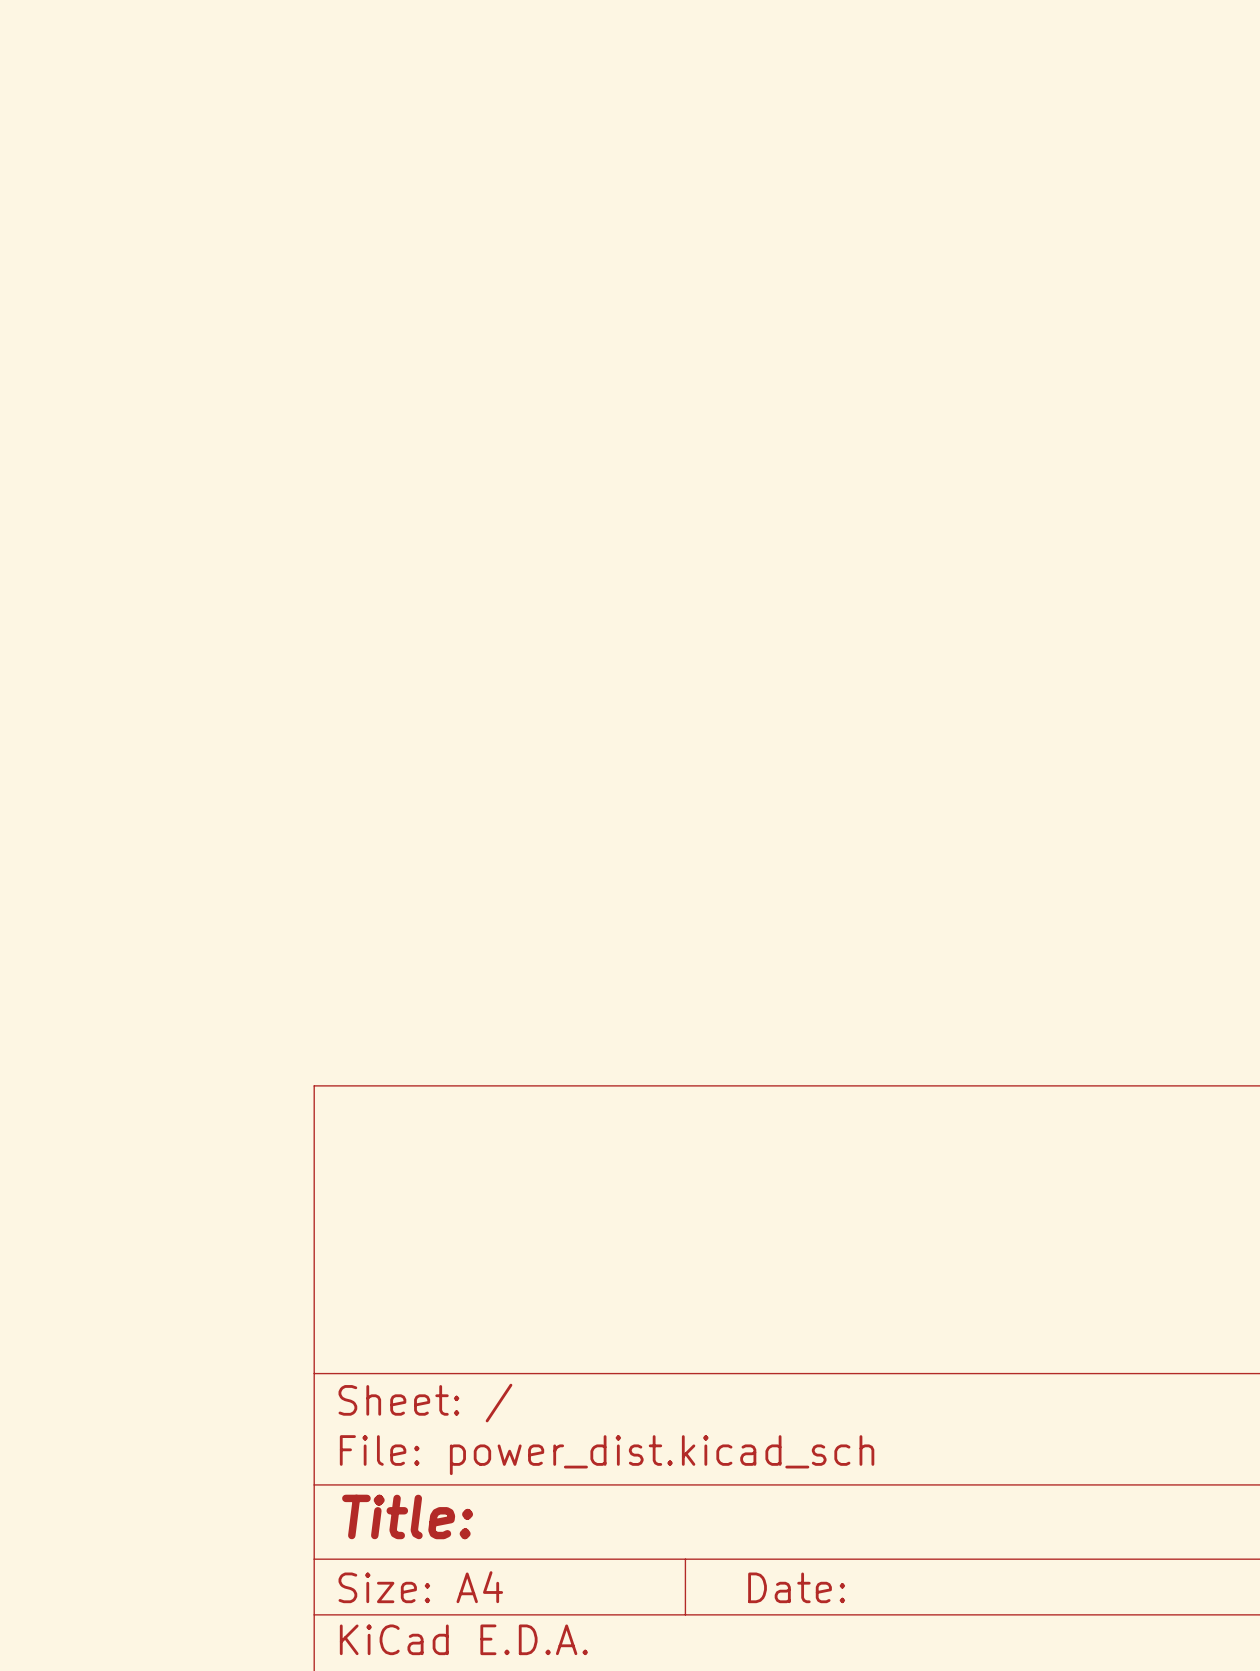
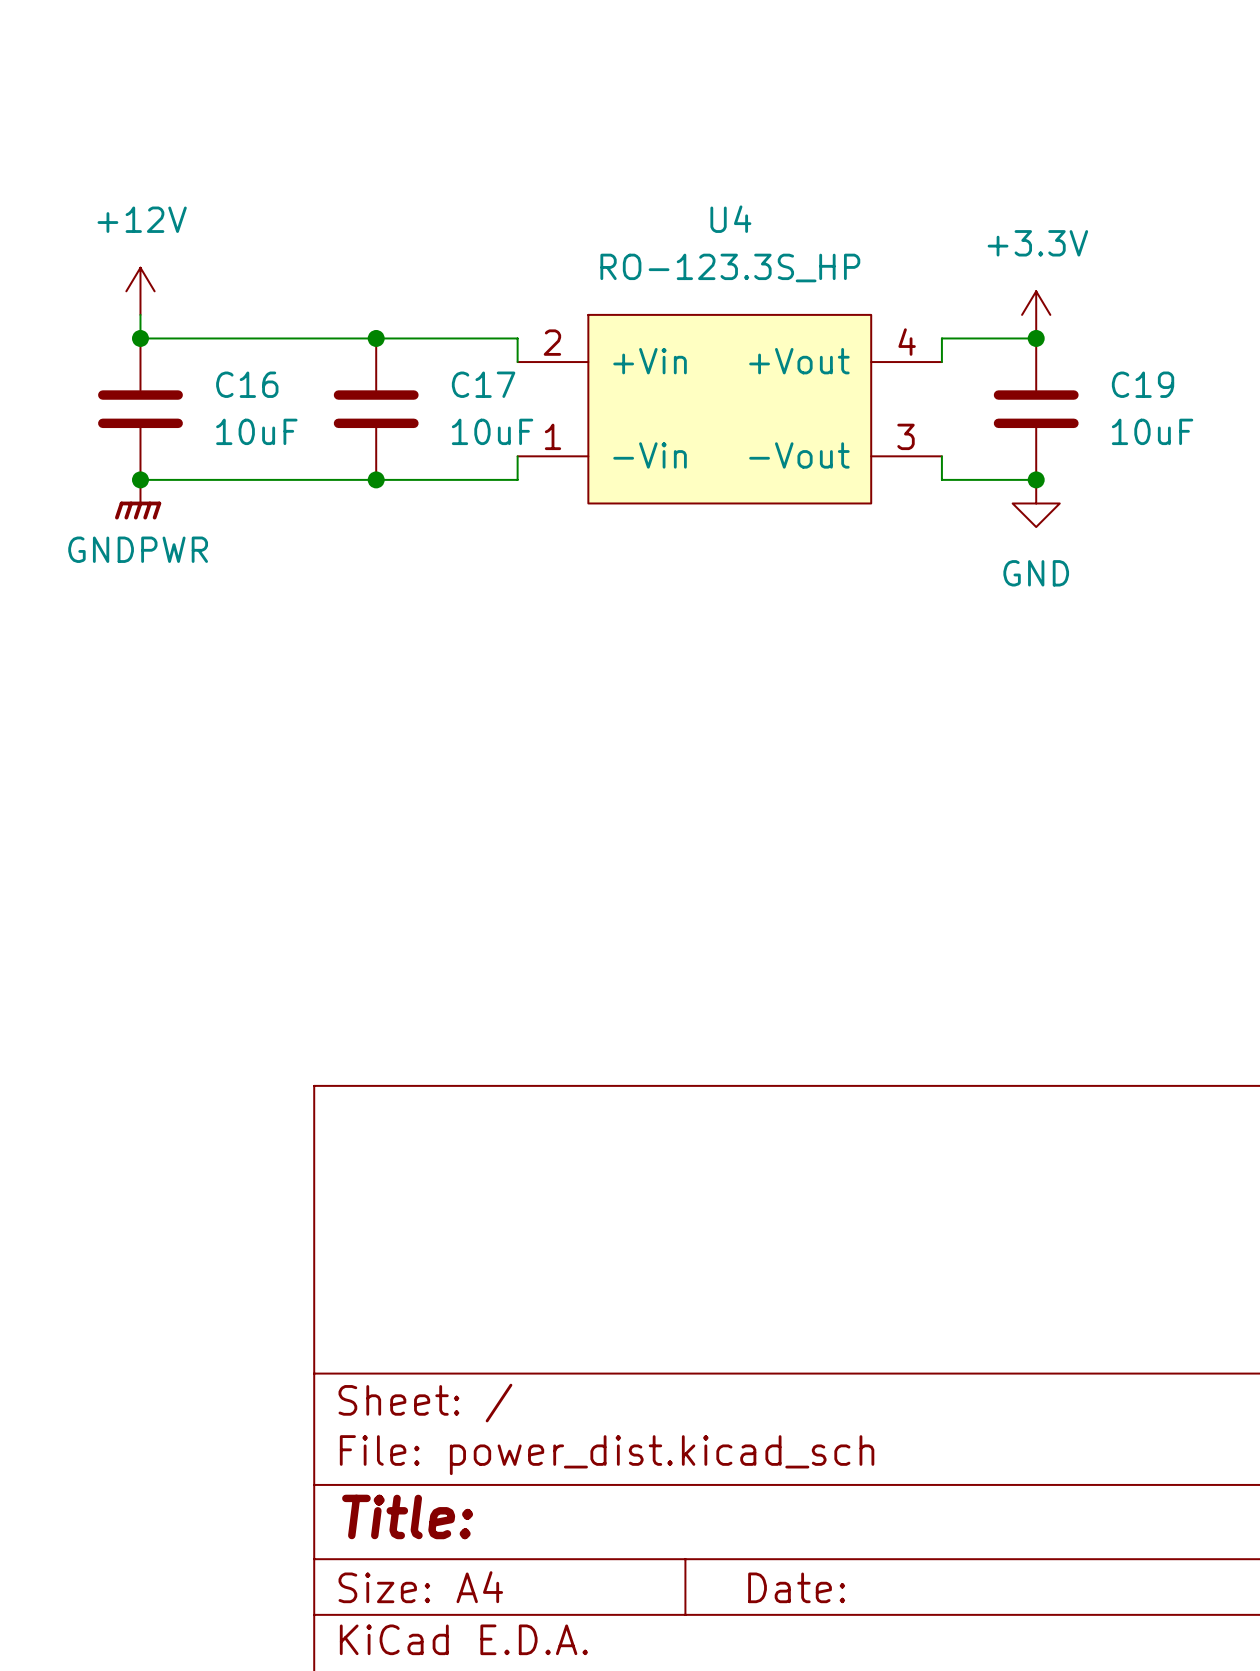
power symbol: none -> +12V (140, 291)
wire: none -> (140, 314) (140, 338) (517, 338) (517, 362)
power symbol: none -> +3.3V (1036, 314)
junction: none -> (140, 338)
junction: none -> (376, 338)
wire: none -> (1036, 338) (941, 338) (941, 362)
junction: none -> (1036, 338)
C16: none -> 10uF (140, 409)
C17: none -> 10uF (376, 409)
U4: none -> RO-123.3S_HP (729, 409)
C19: none -> 10uF (1036, 409)
wire: none -> (517, 456) (517, 479) (140, 479)
wire: none -> (941, 456) (941, 479) (1036, 479)
junction: none -> (140, 479)
junction: none -> (376, 479)
junction: none -> (1036, 479)
power symbol: none -> GNDPWR (138, 499)
power symbol: none -> GND (1036, 503)

